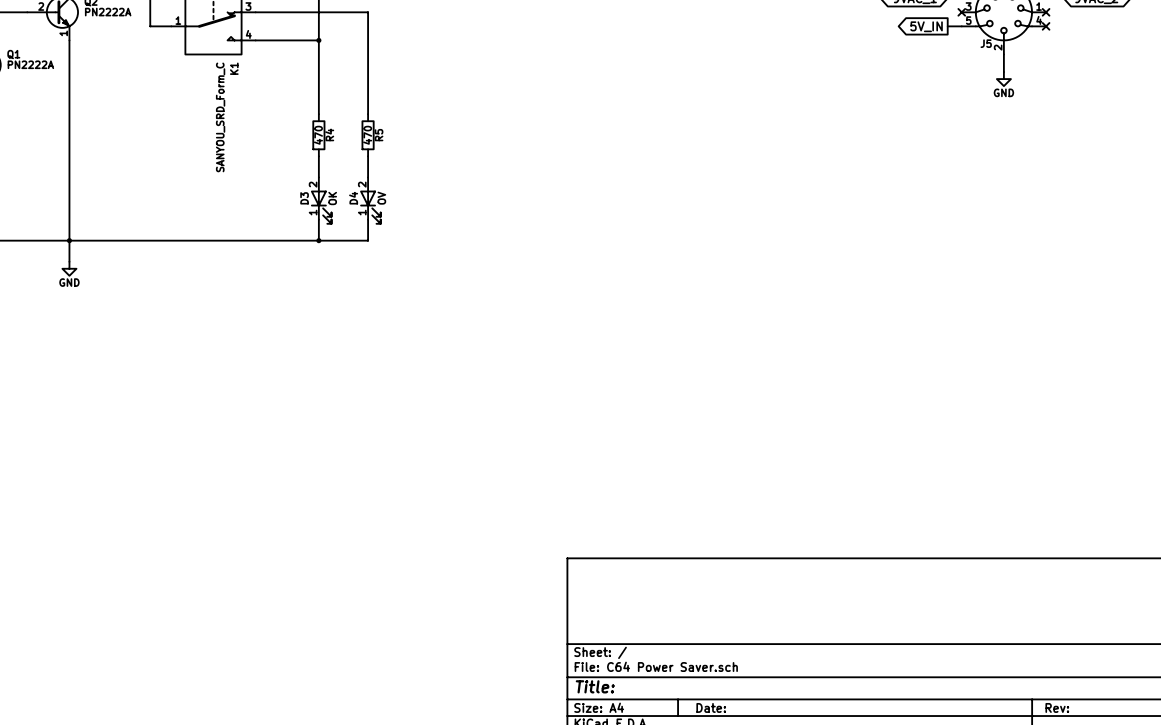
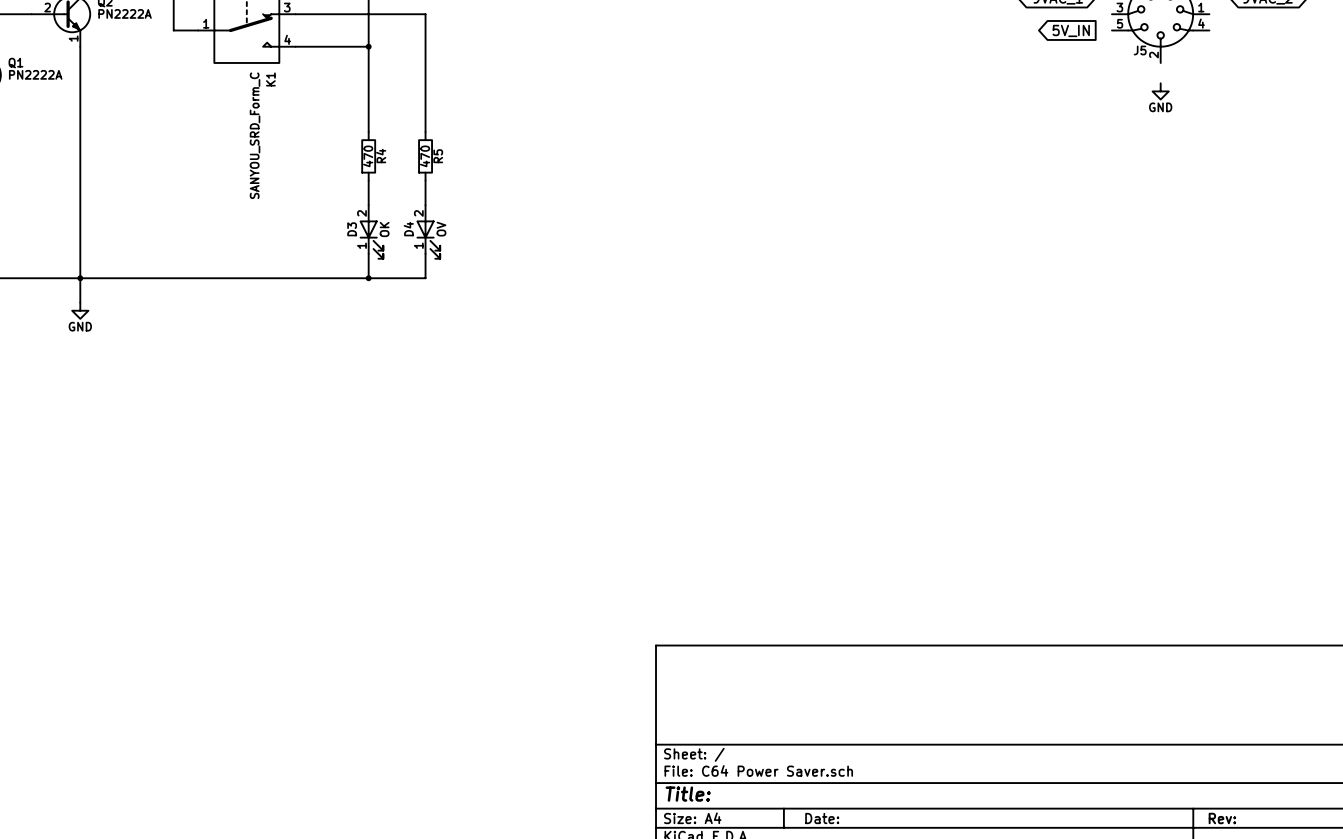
no-connect mark: (961, 12) -> none
no-connect mark: (1046, 12) -> none
wire: (947, 26) (961, 26) -> none
no-connect mark: (1046, 26) -> none
wire: (1003, 54) (1003, 72) -> none

